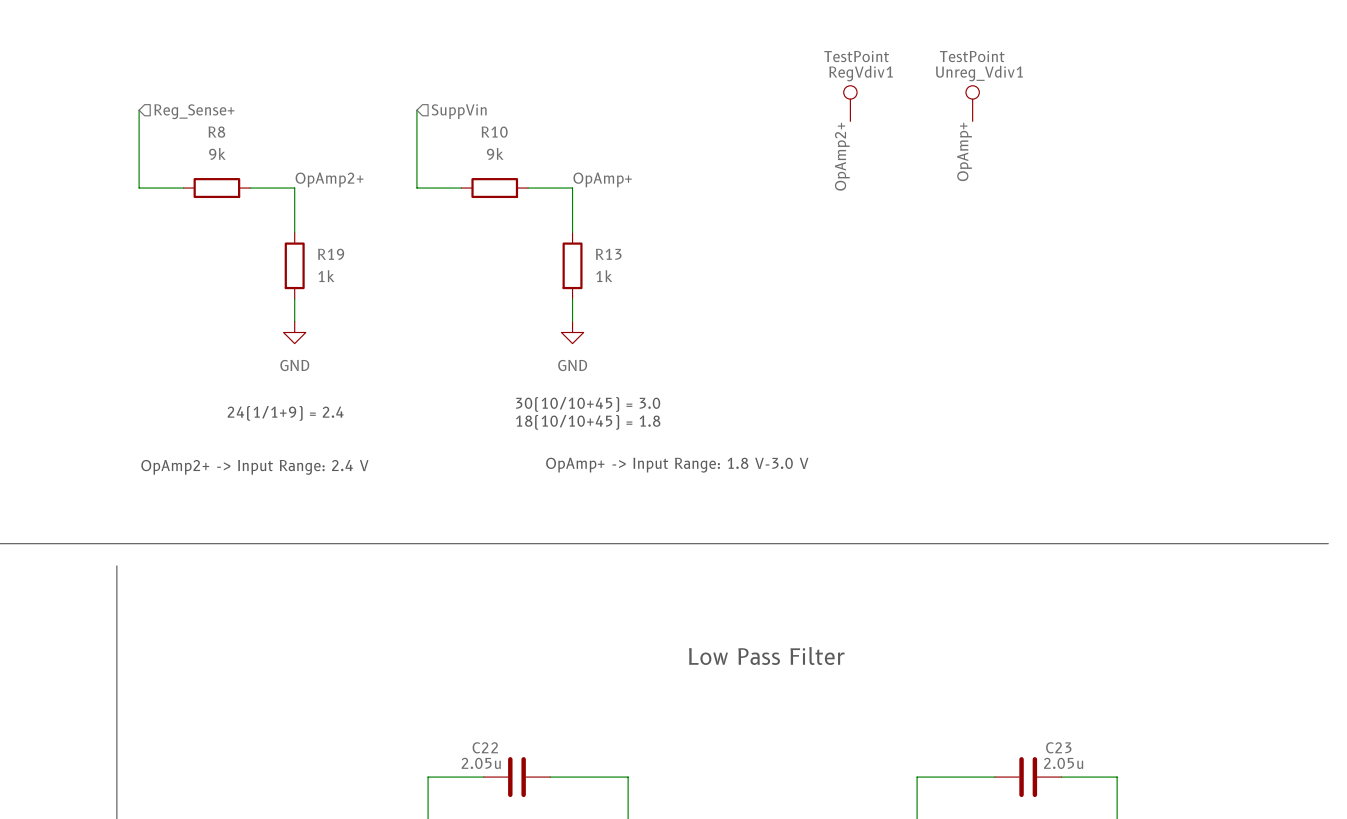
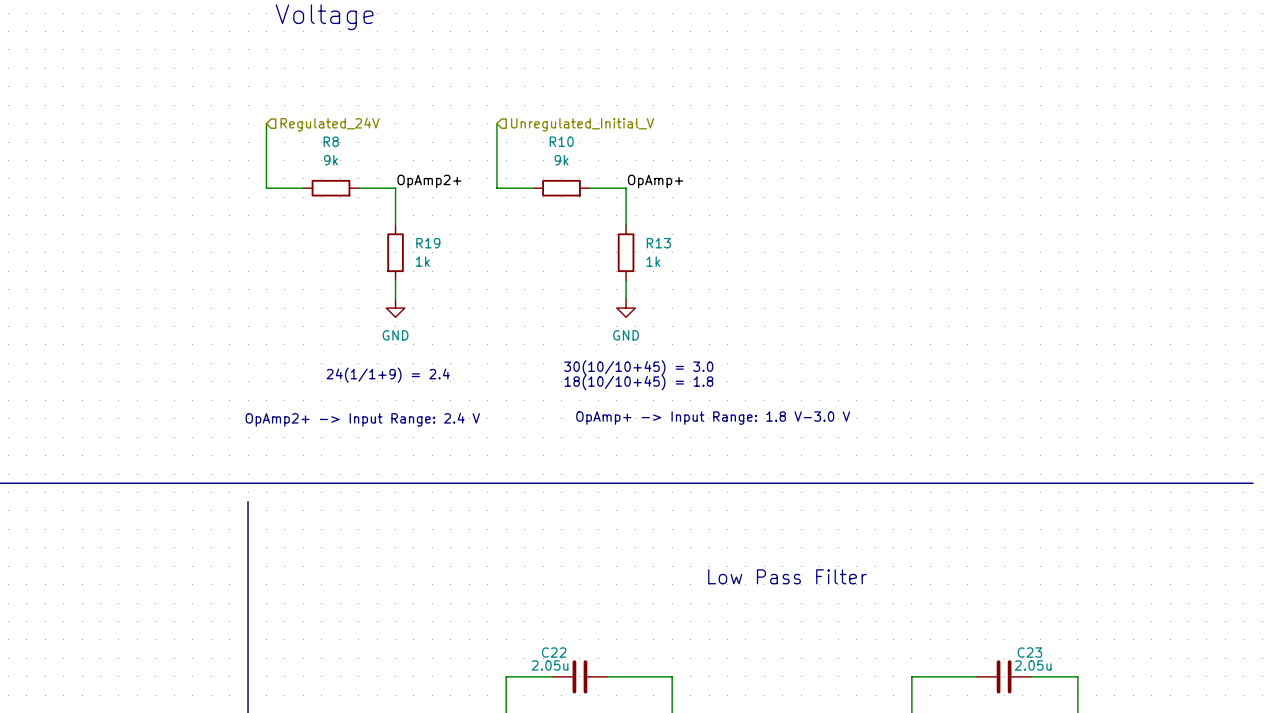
RegVdiv1: TestPoint (850, 103) -> none
Unreg_Vdiv1: TestPoint (972, 103) -> none
hierarchical label: Reg_Sense+ (194, 111) -> Regulated_24V (330, 124)
hierarchical label: SuppVin (459, 111) -> Unregulated_Initial_V (582, 124)
label: OpAmp+ (964, 151) -> none
label: OpAmp2+ (842, 156) -> none

